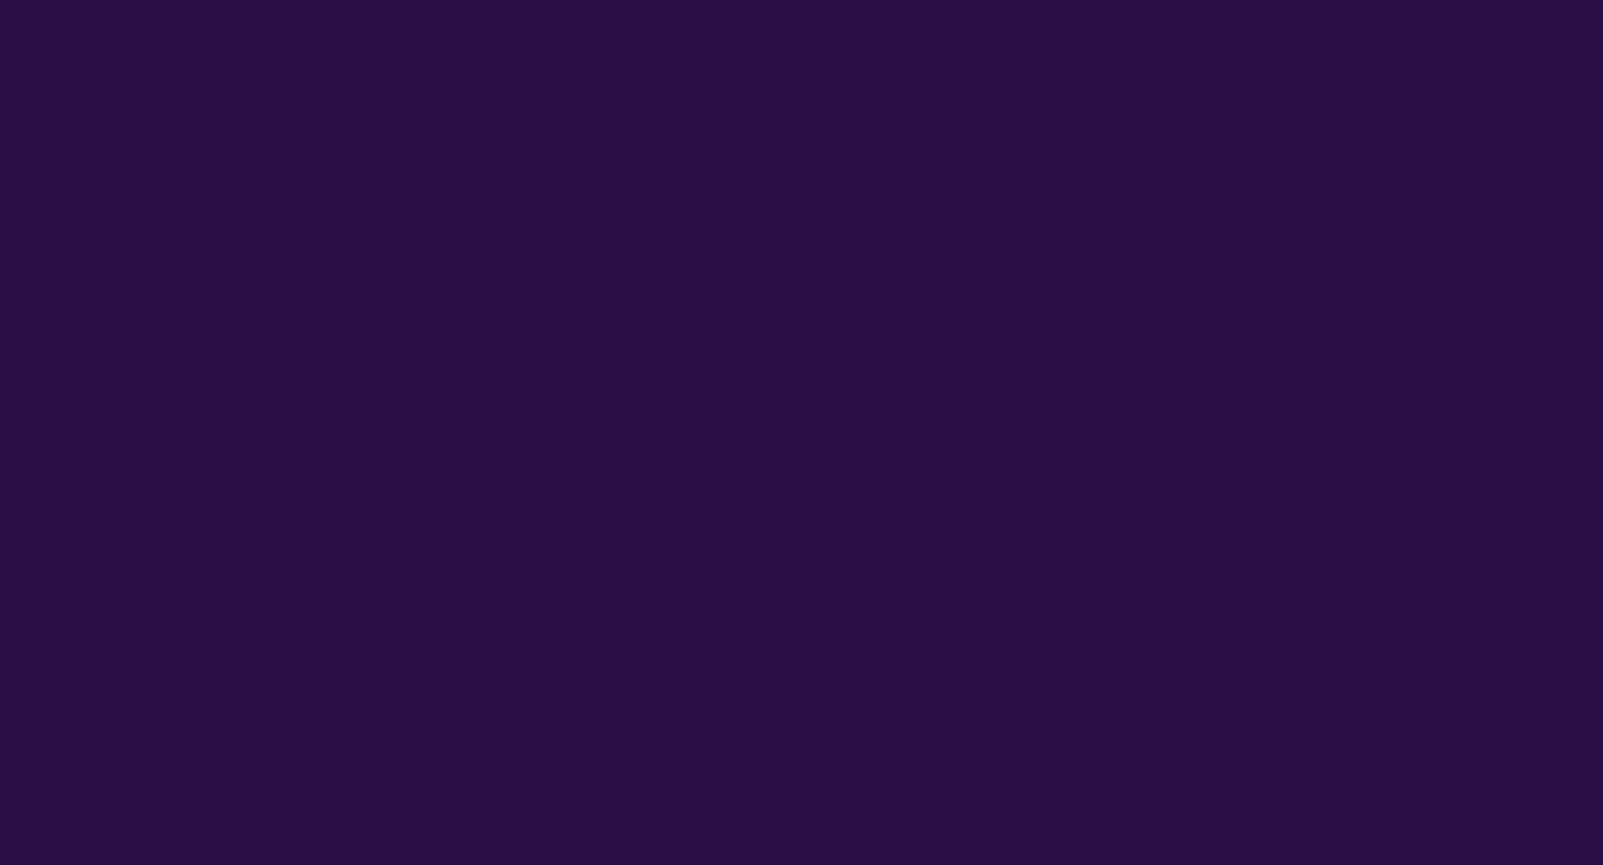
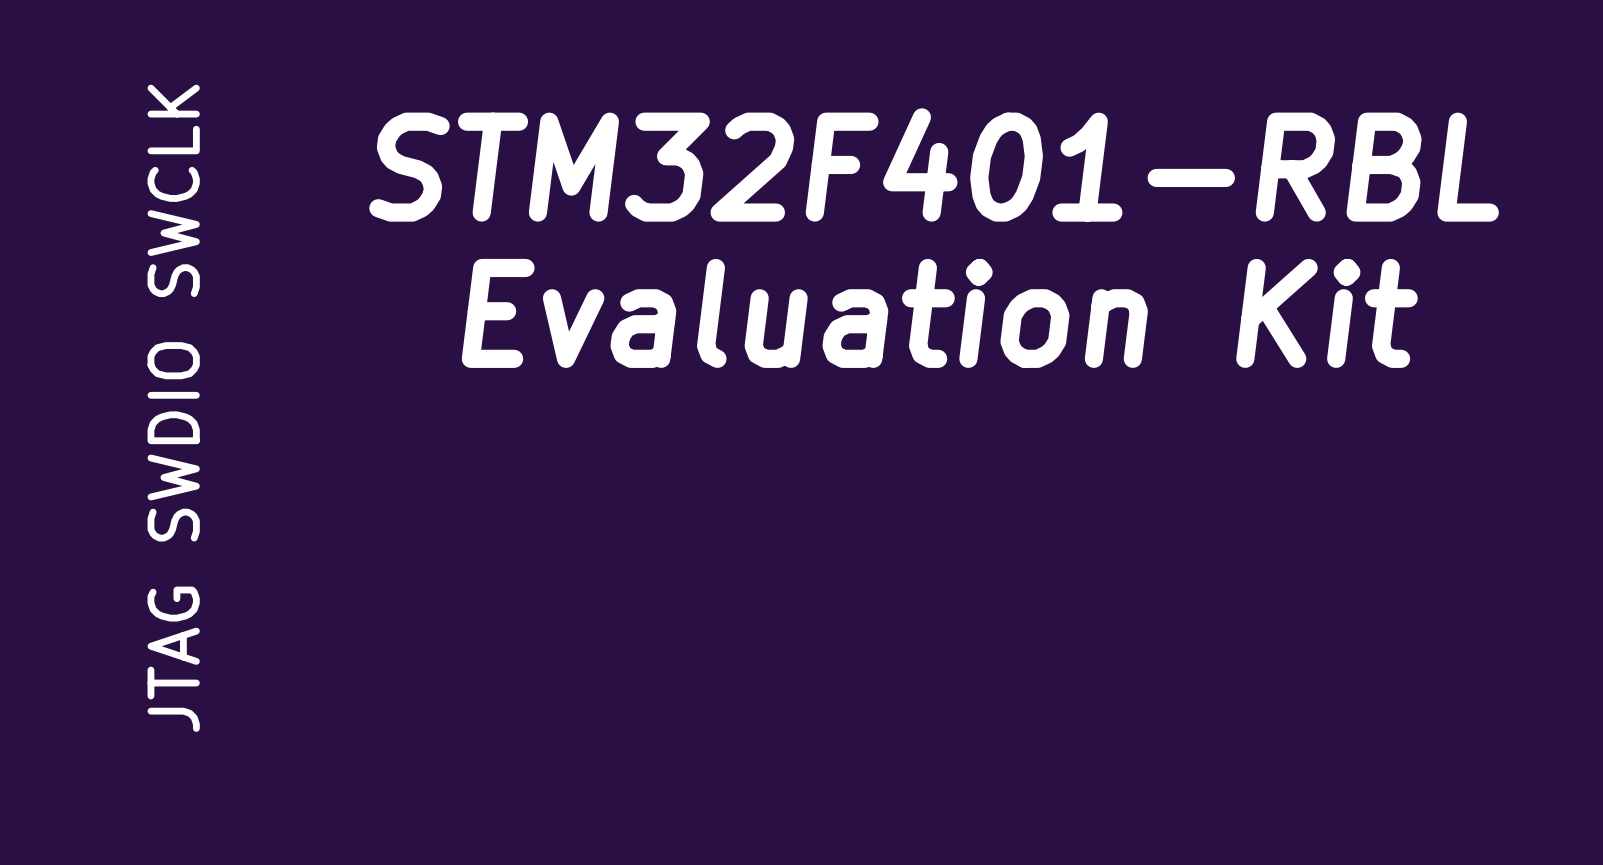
text: none -> STM32F401-RBL (934, 164)
text: none -> Evaluation Kit (939, 313)
text: none -> JTAG SWDIO SWCLK (173, 408)

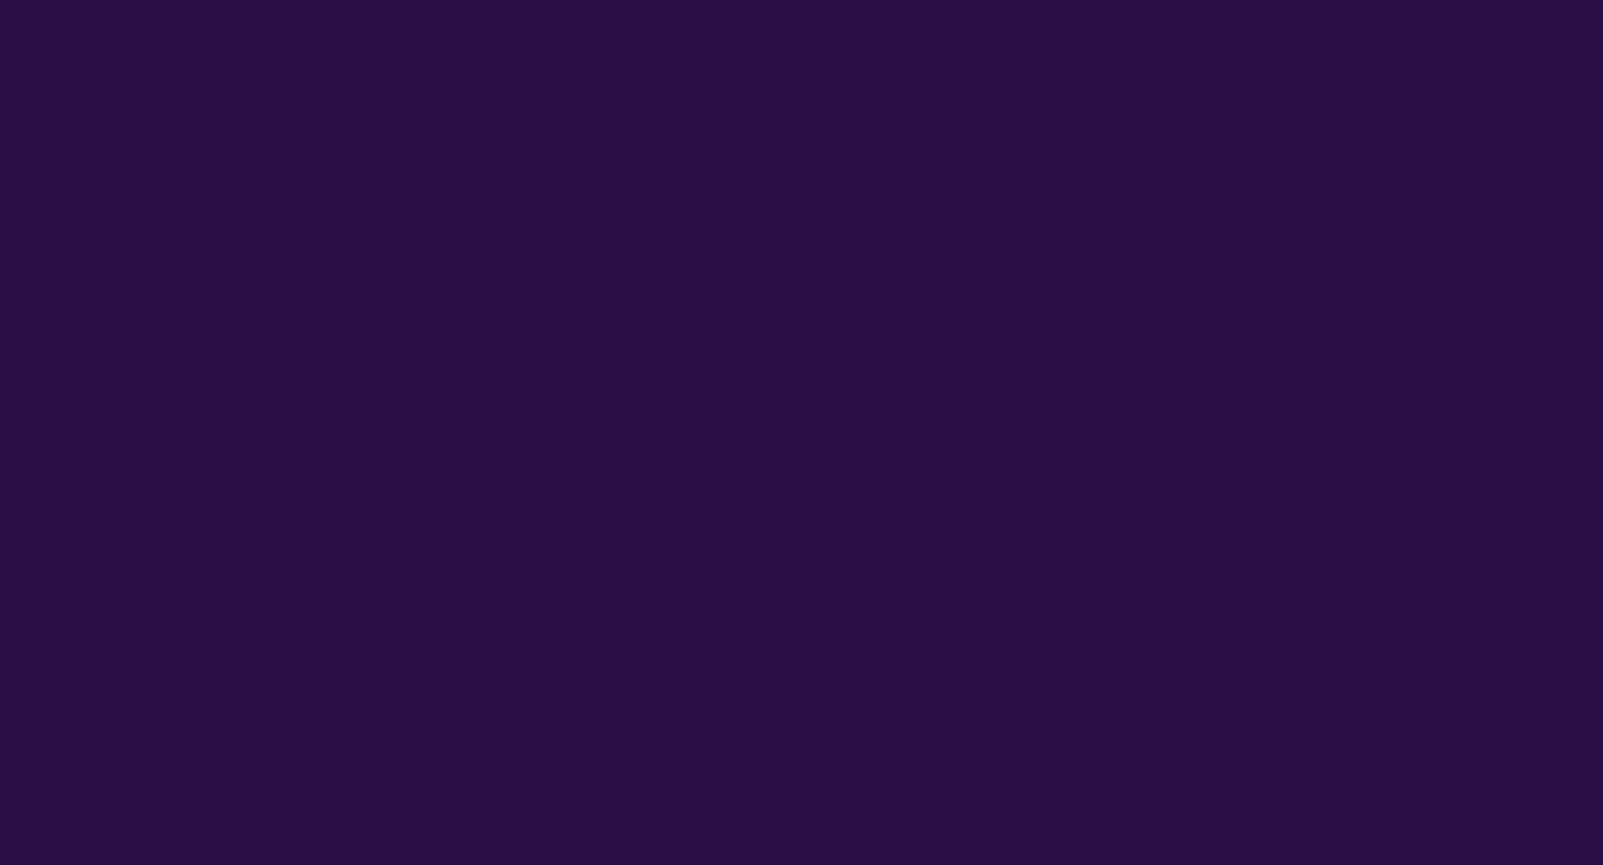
text: STM32F401-RBL (934, 164) -> none
text: Evaluation Kit (939, 313) -> none
text: JTAG SWDIO SWCLK (173, 408) -> none

